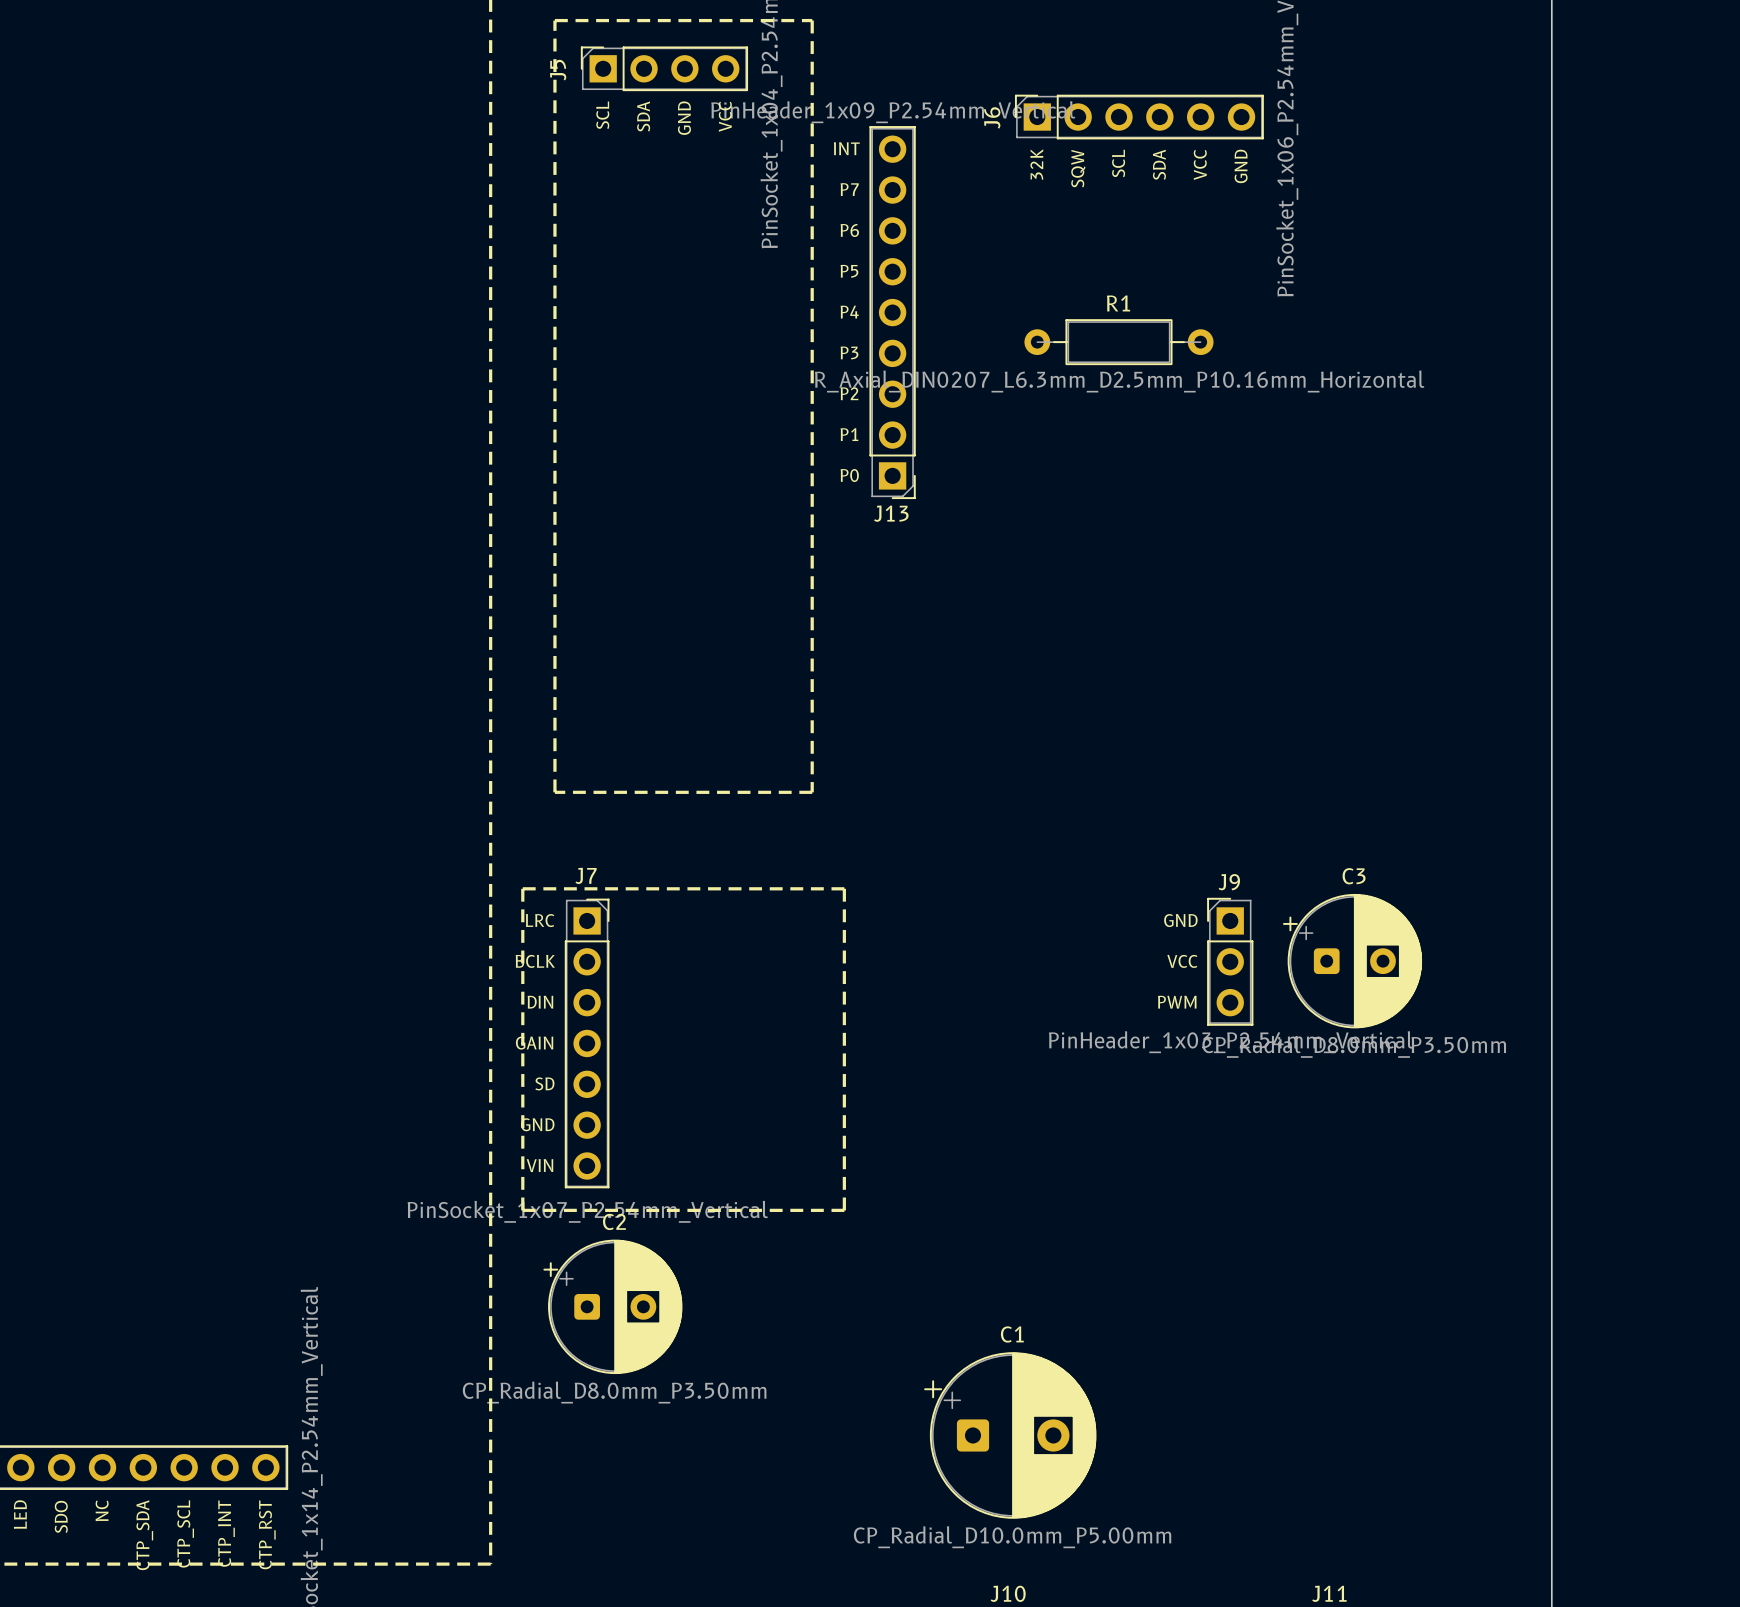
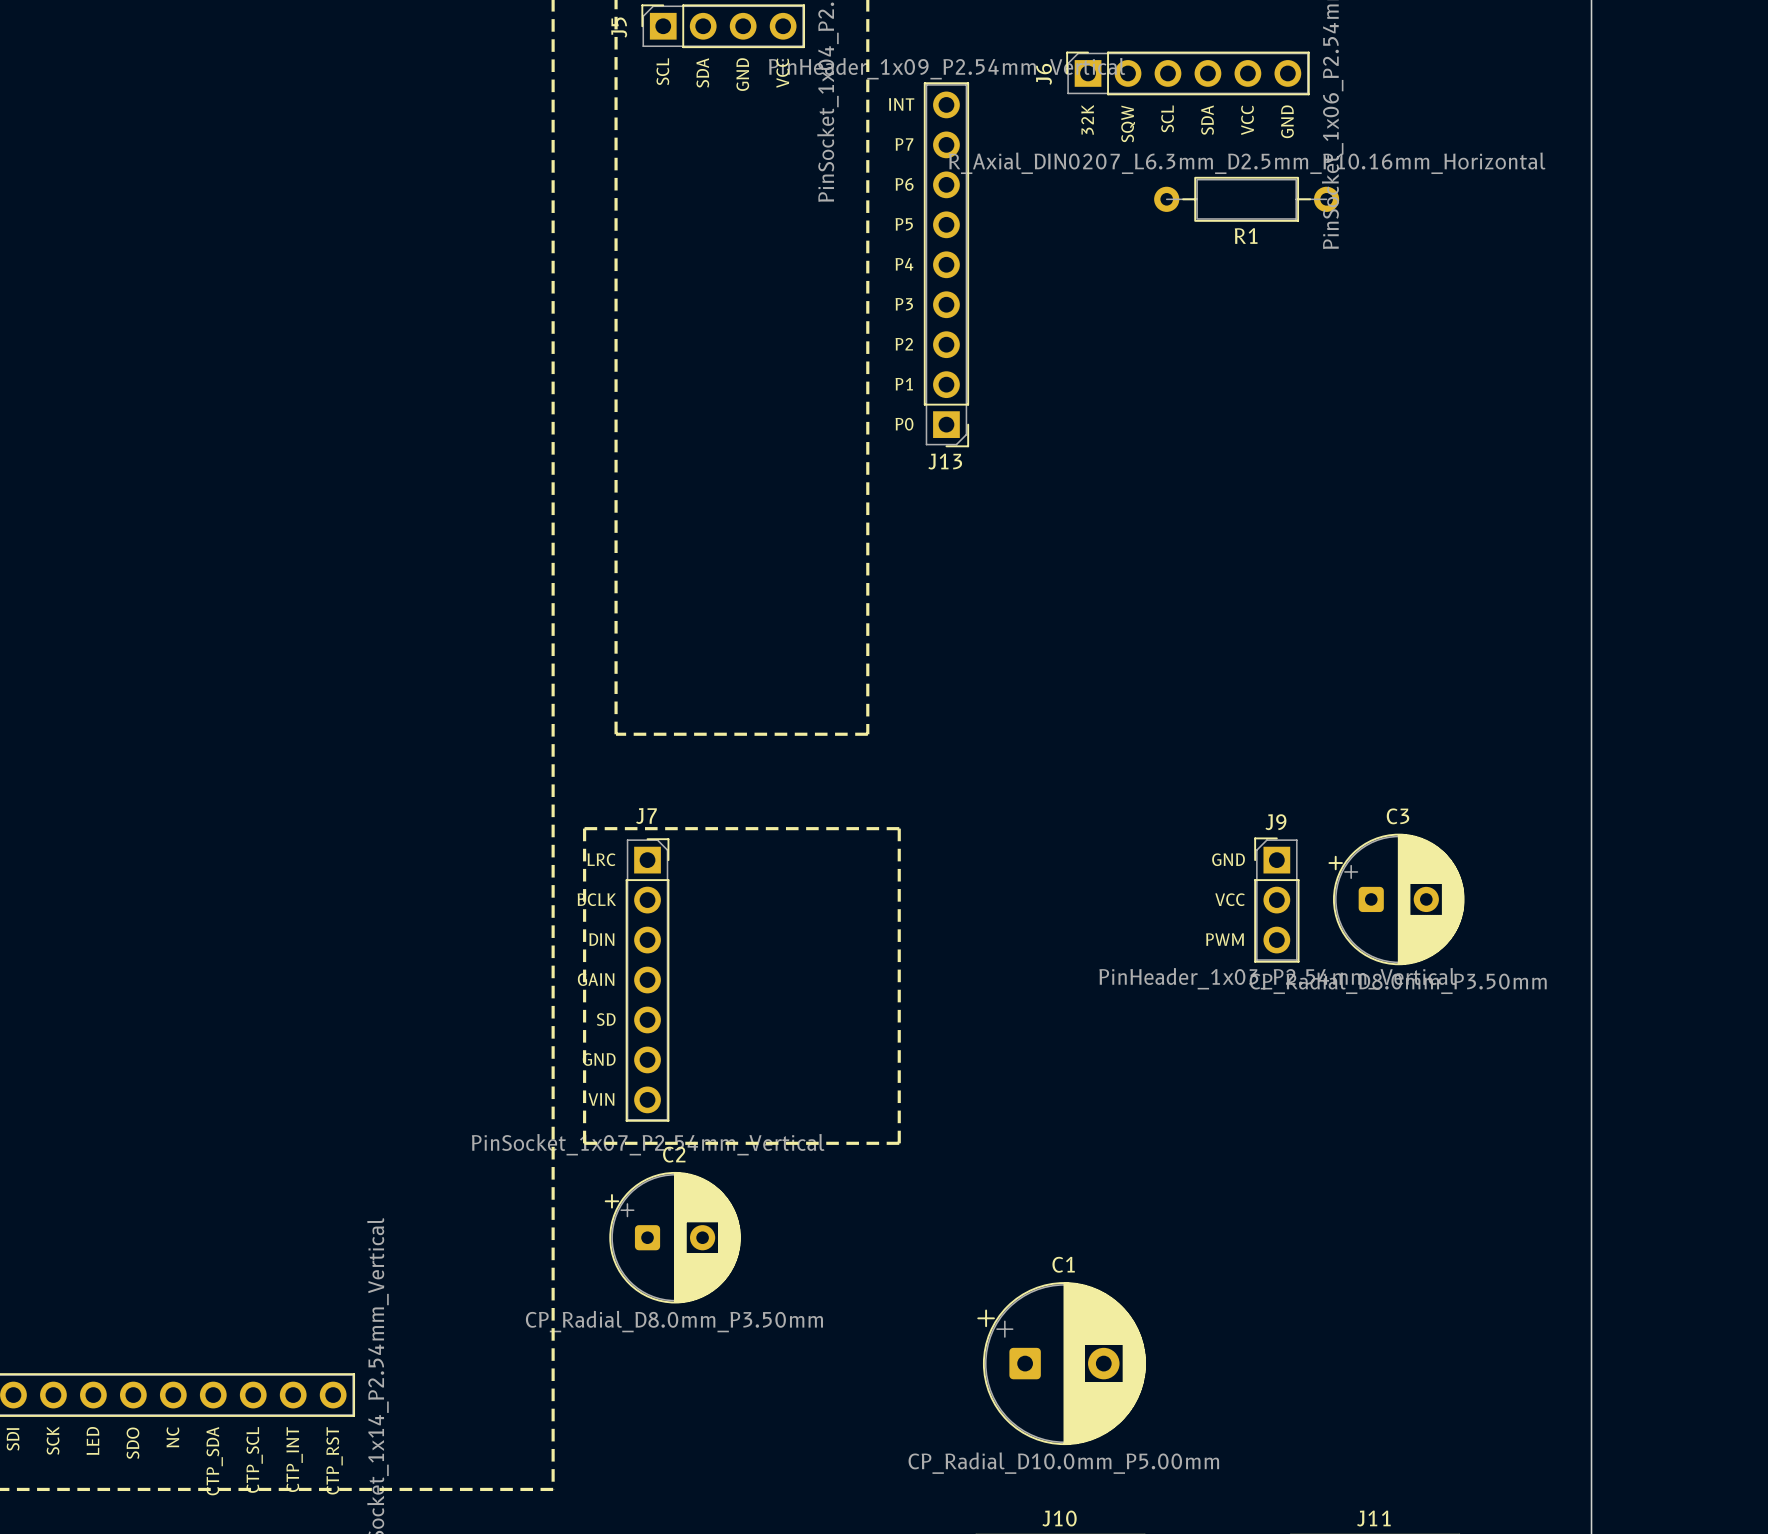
R1 name position: R1 (1118, 303) -> R1 (1246, 236)
R1 position: (1118, 342) -> (1246, 199)
R1 value position: R_Axial_DIN0207_L6.3mm_D2.5mm_P10.16mm_Horizontal (1119, 381) -> R_Axial_DIN0207_L6.3mm_D2.5mm_P10.16mm_Horizontal (1247, 163)

